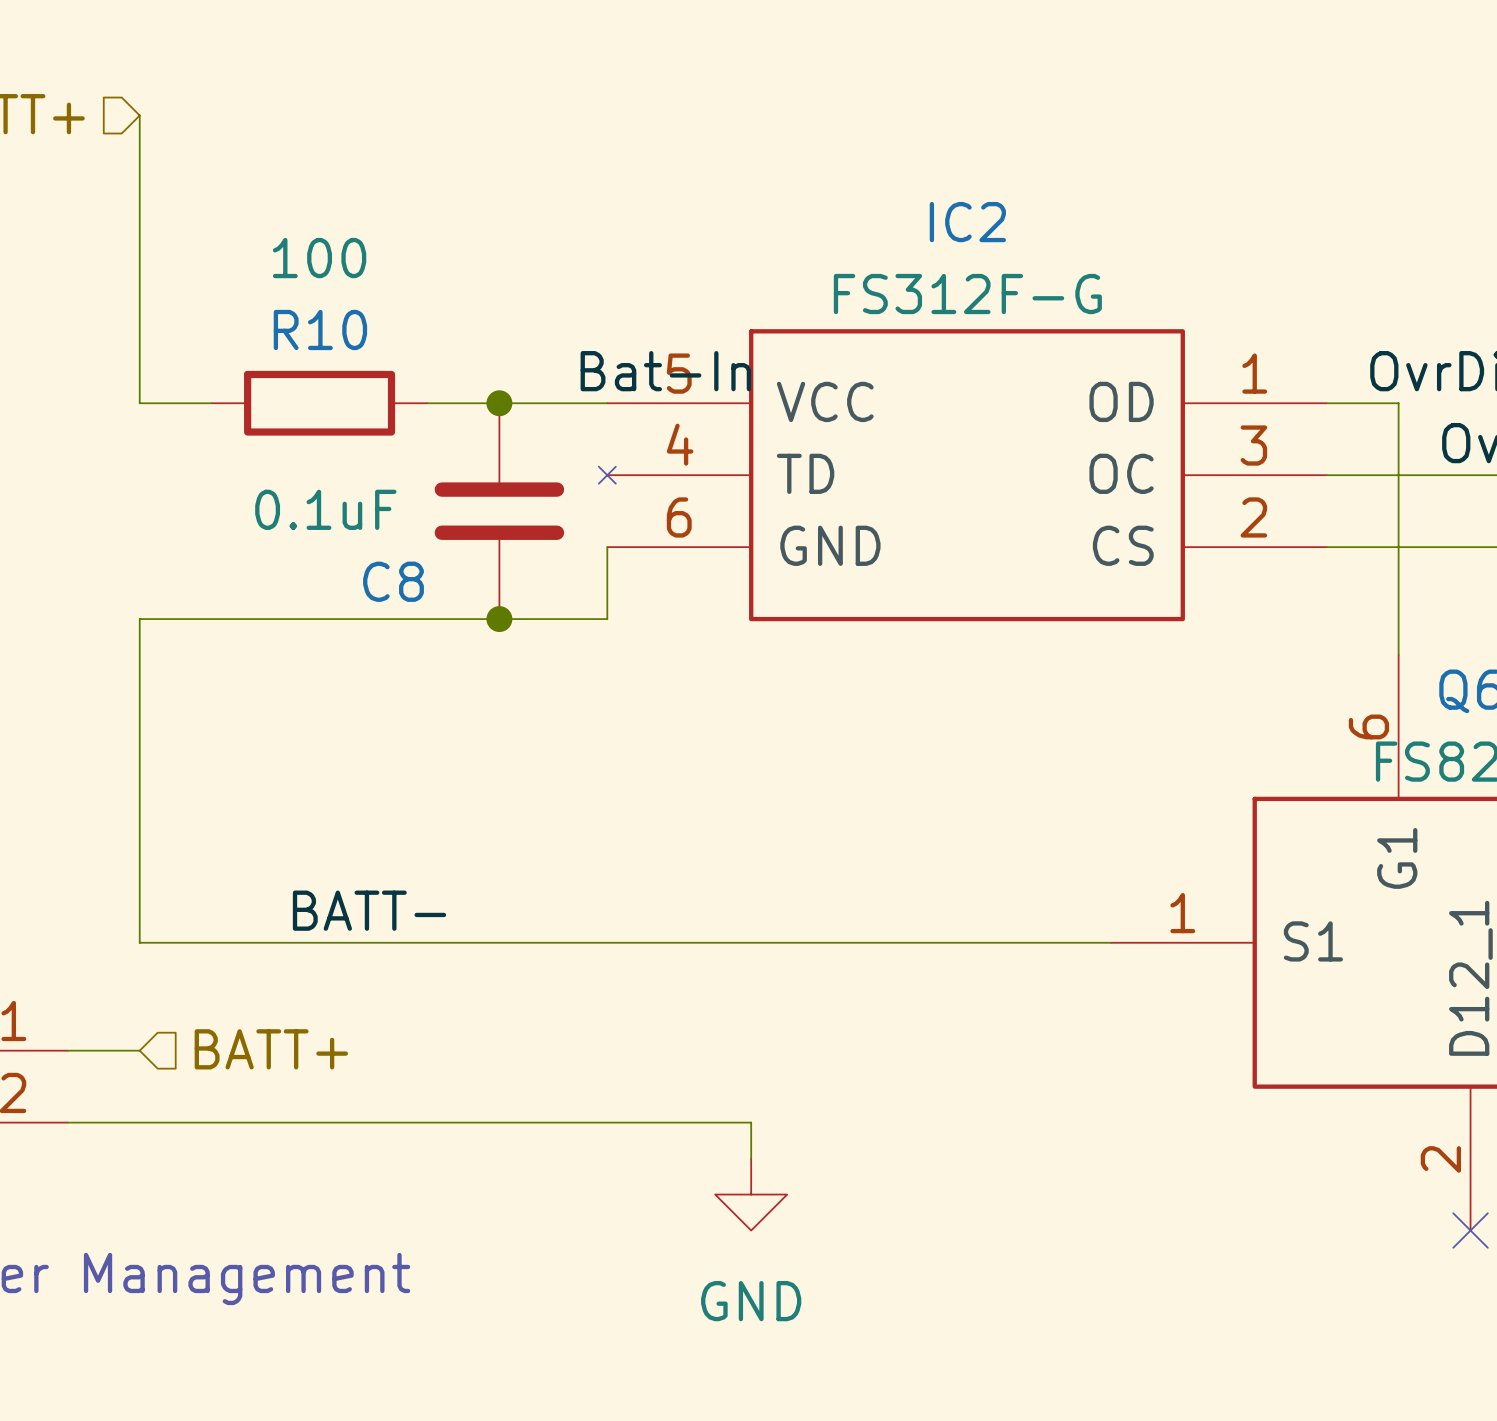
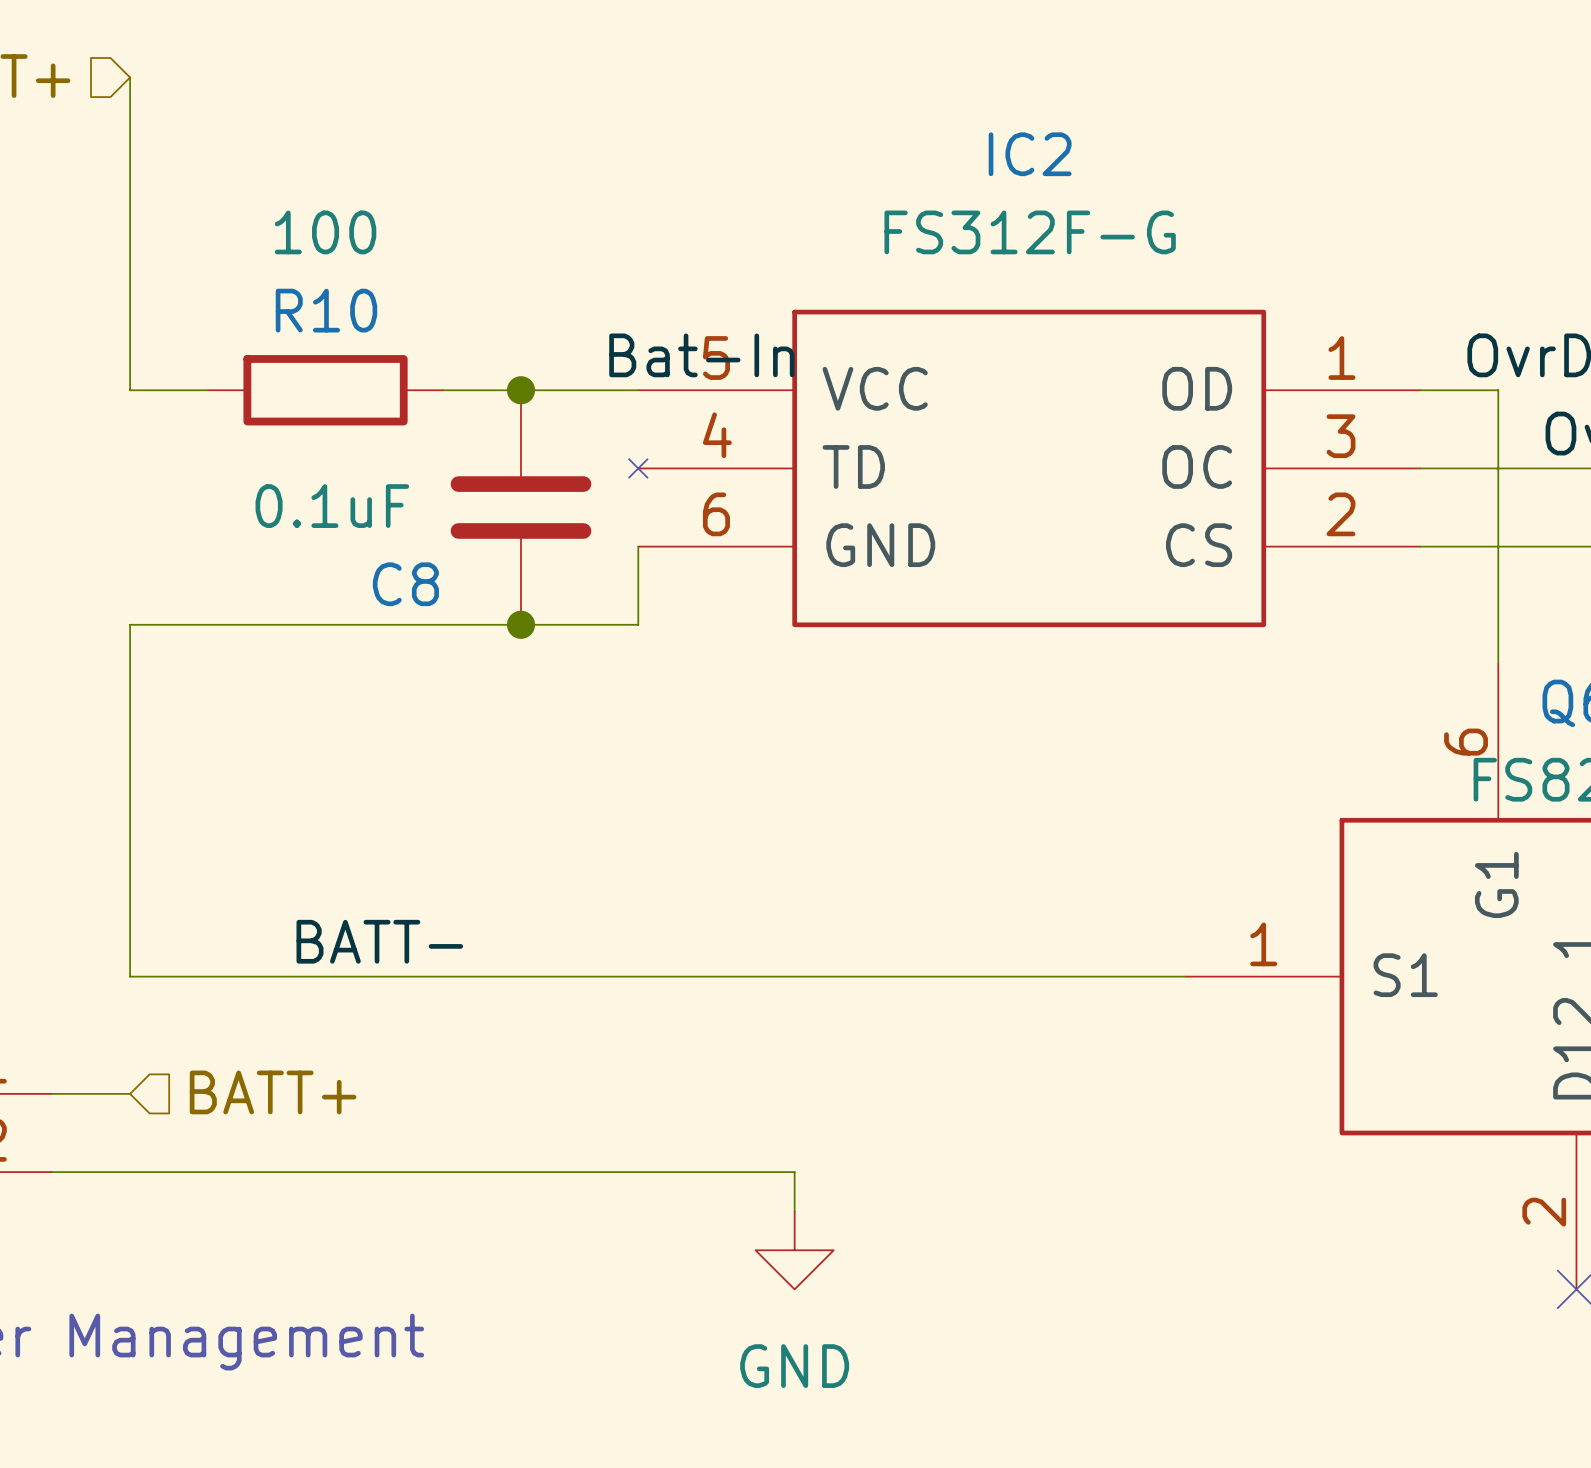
IC2 name position: IC2 (967, 222) -> IC2 (1030, 154)
IC2 value position: FS312F-G (967, 294) -> FS312F-G (1030, 232)

